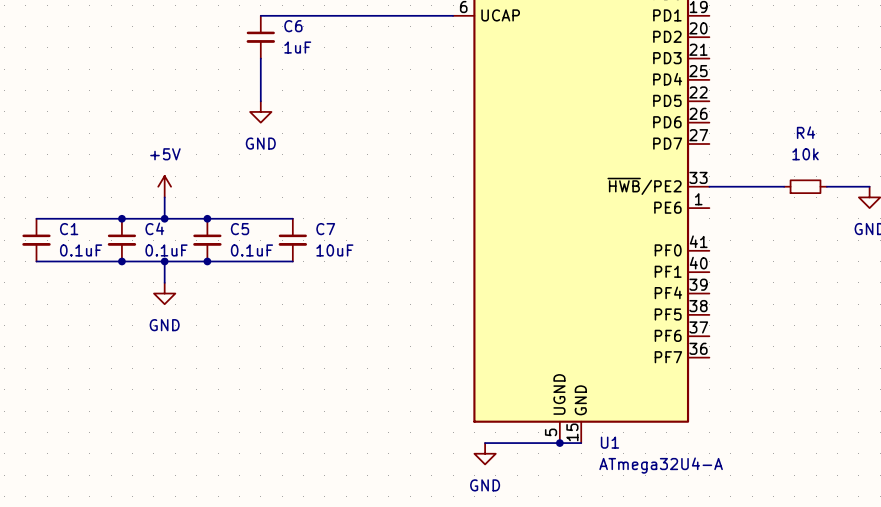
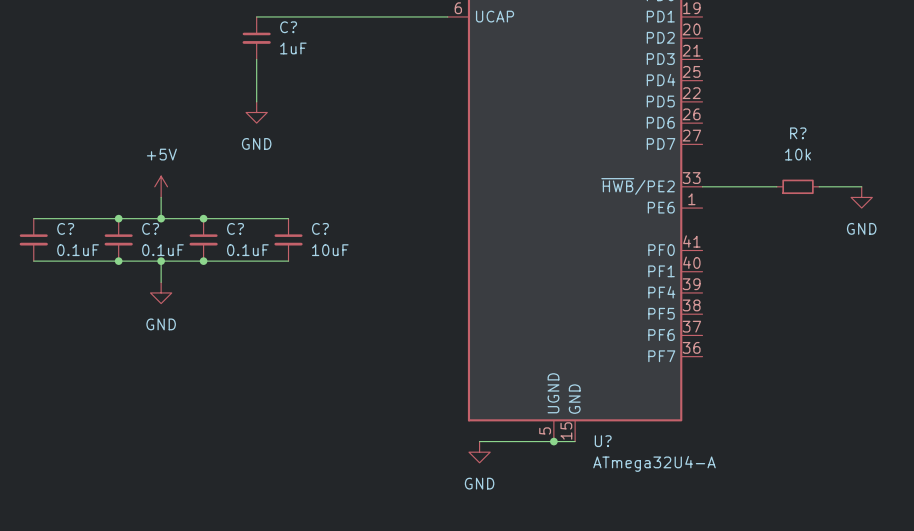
C6 name: C6 (293, 26) -> C? (288, 27)
R4 name: R4 (806, 132) -> R? (798, 133)
C4 name: C4 (154, 228) -> C? (150, 228)
C1 name: C1 (69, 229) -> C? (65, 228)
C5 name: C5 (240, 229) -> C? (235, 228)
C7 name: C7 (325, 229) -> C? (320, 228)
U1 name: U1 (609, 442) -> U? (603, 441)

